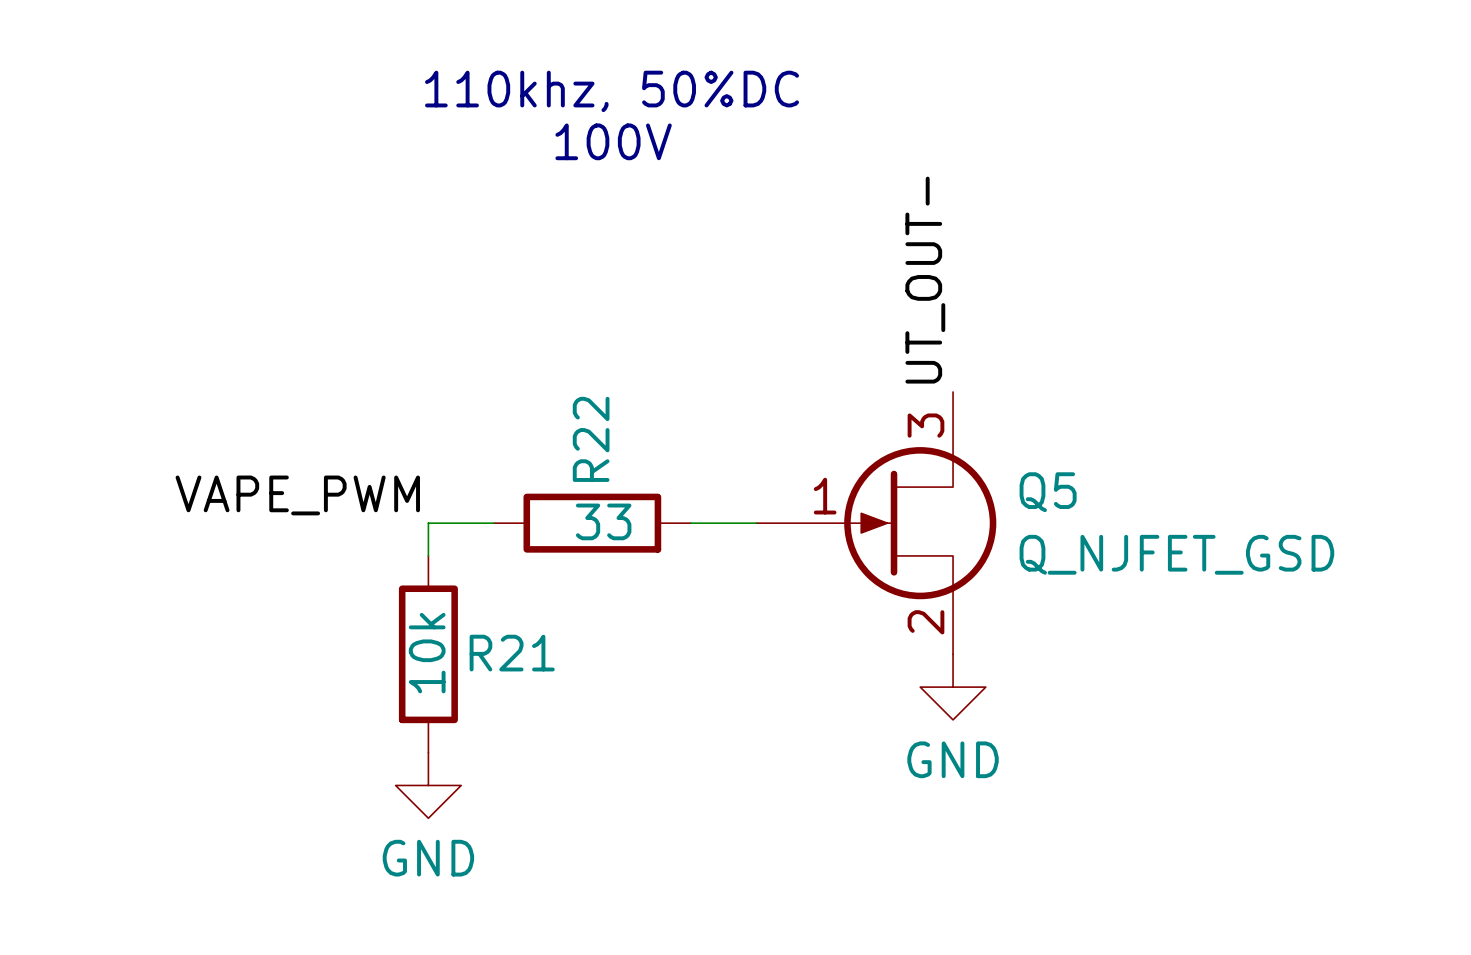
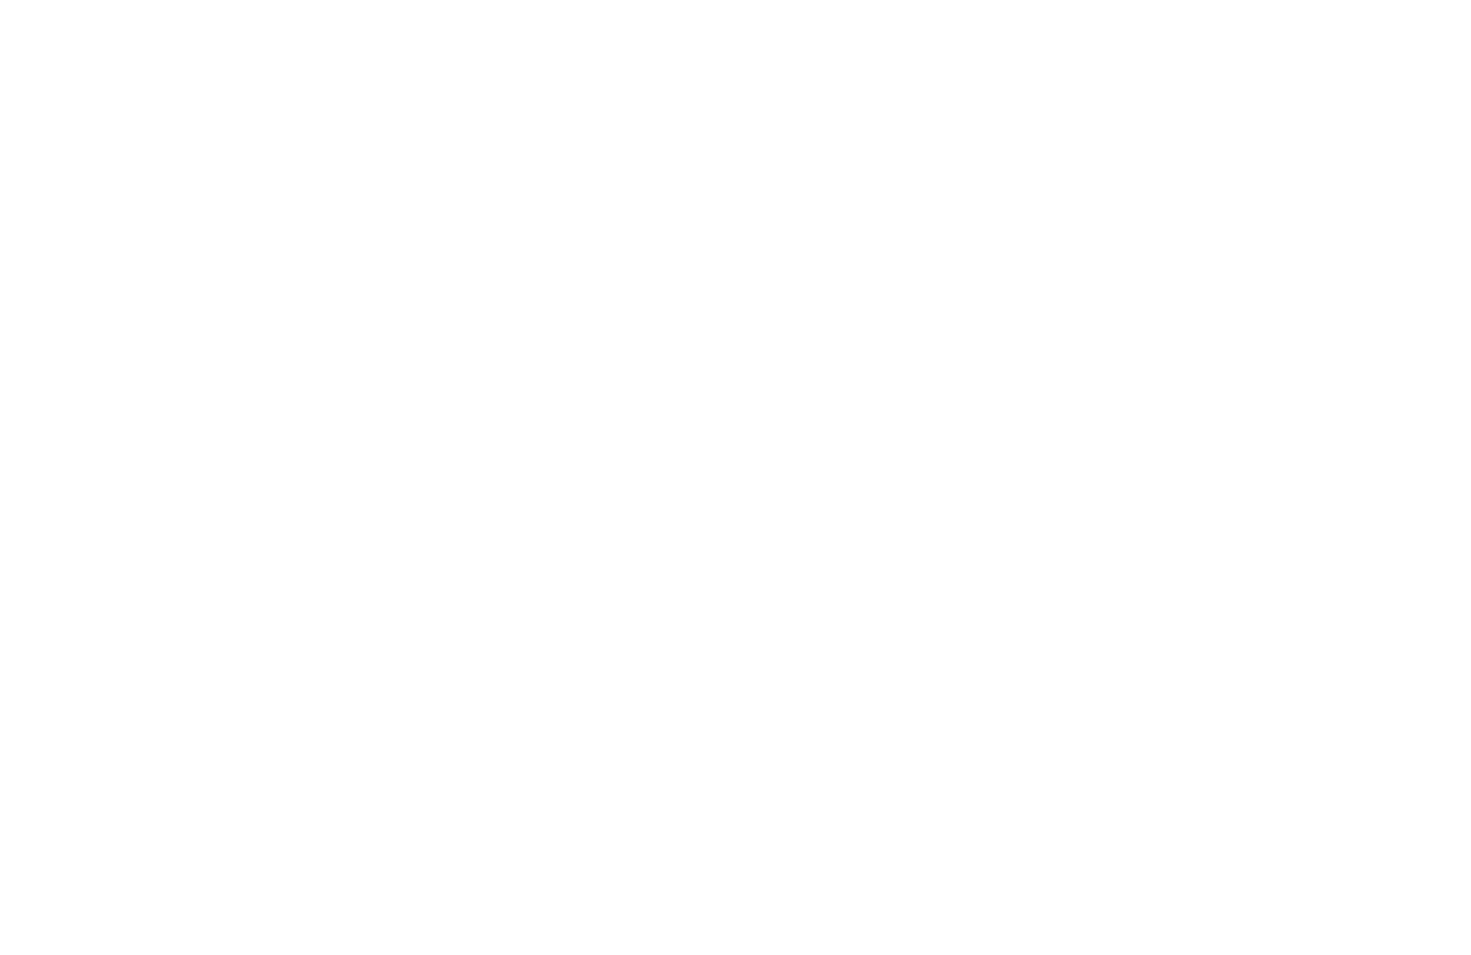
text: 110khz, 50%DC (612, 91) -> none
text: 100V (613, 141) -> none
label: UT_OUT- (925, 280) -> none
label: VAPE_PWM (297, 495) -> none
wire: (493, 523) (428, 523) (428, 555) -> none
R22: 33 (592, 523) -> none
wire: (690, 523) (756, 523) -> none
Q5: Q_NJFET_GSD (876, 523) -> none
R21: 10k (428, 654) -> none
power symbol: GND (953, 687) -> none
power symbol: GND (428, 785) -> none

